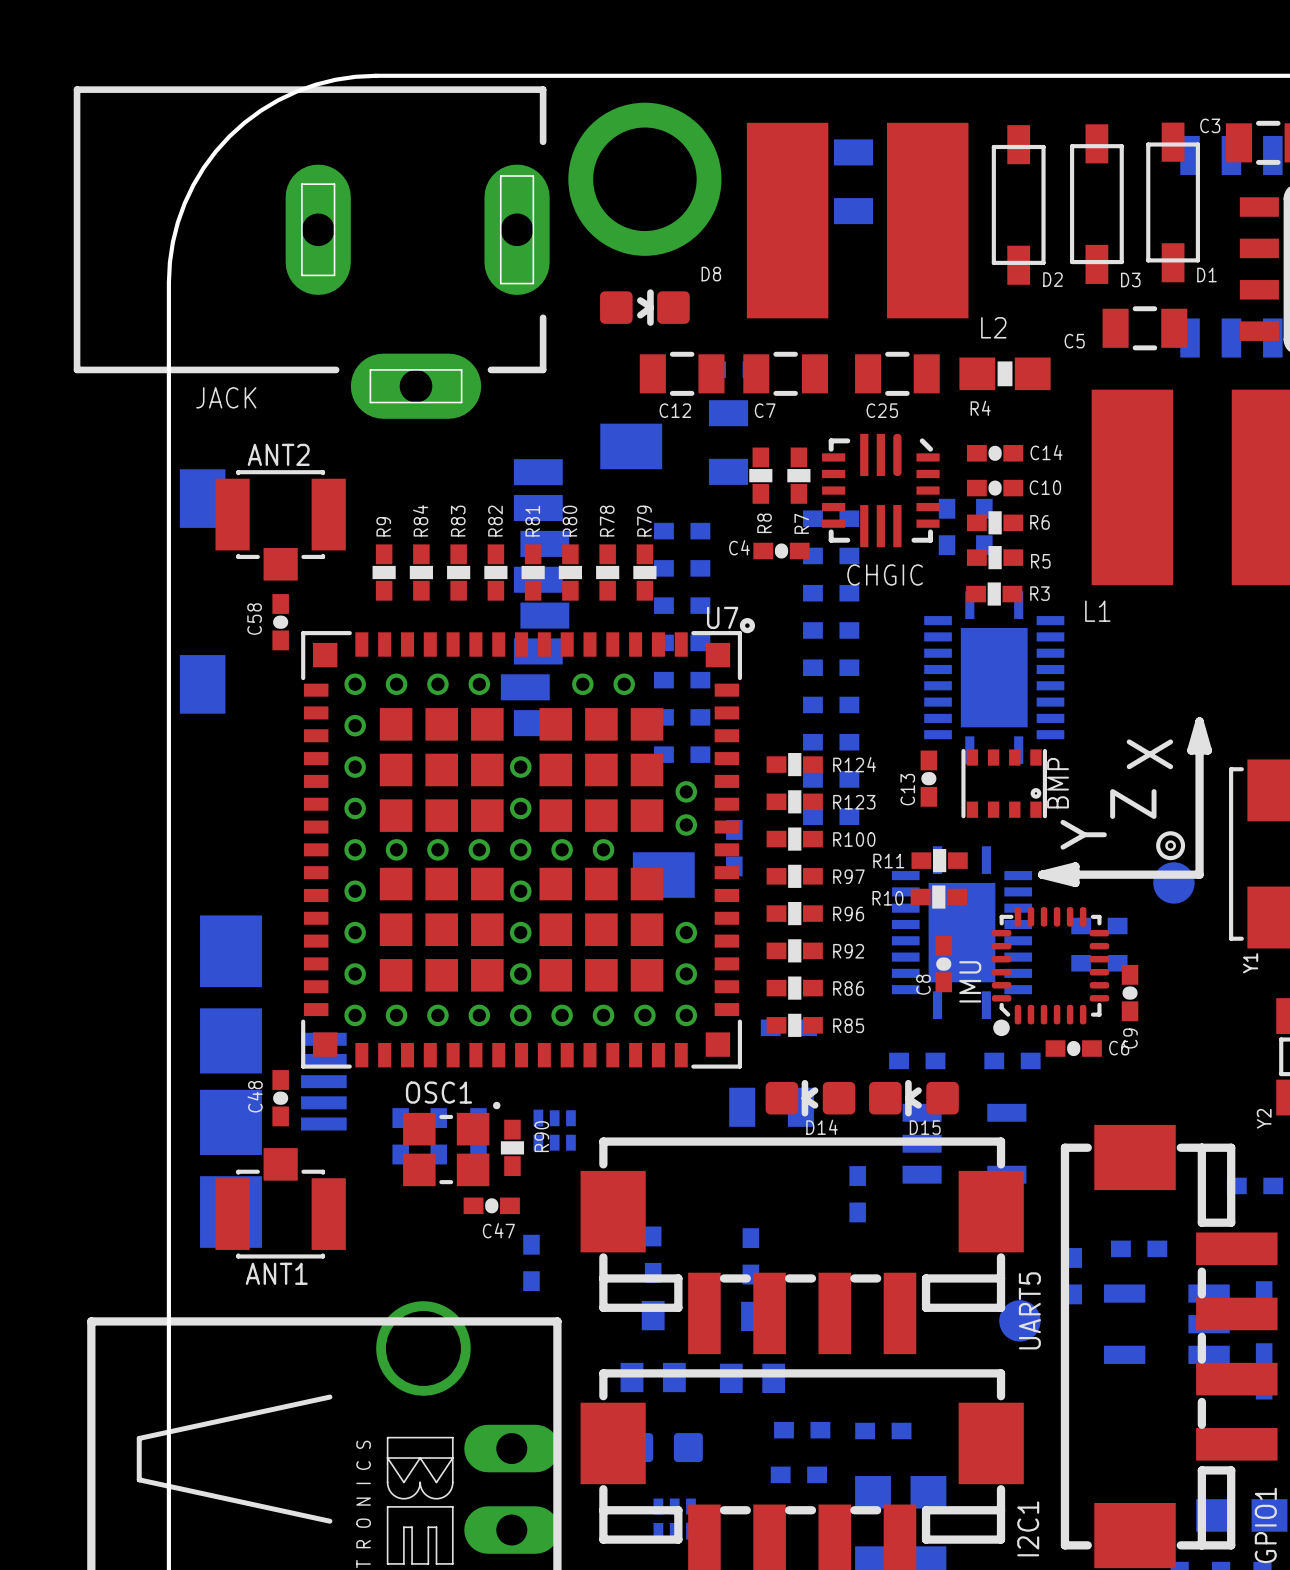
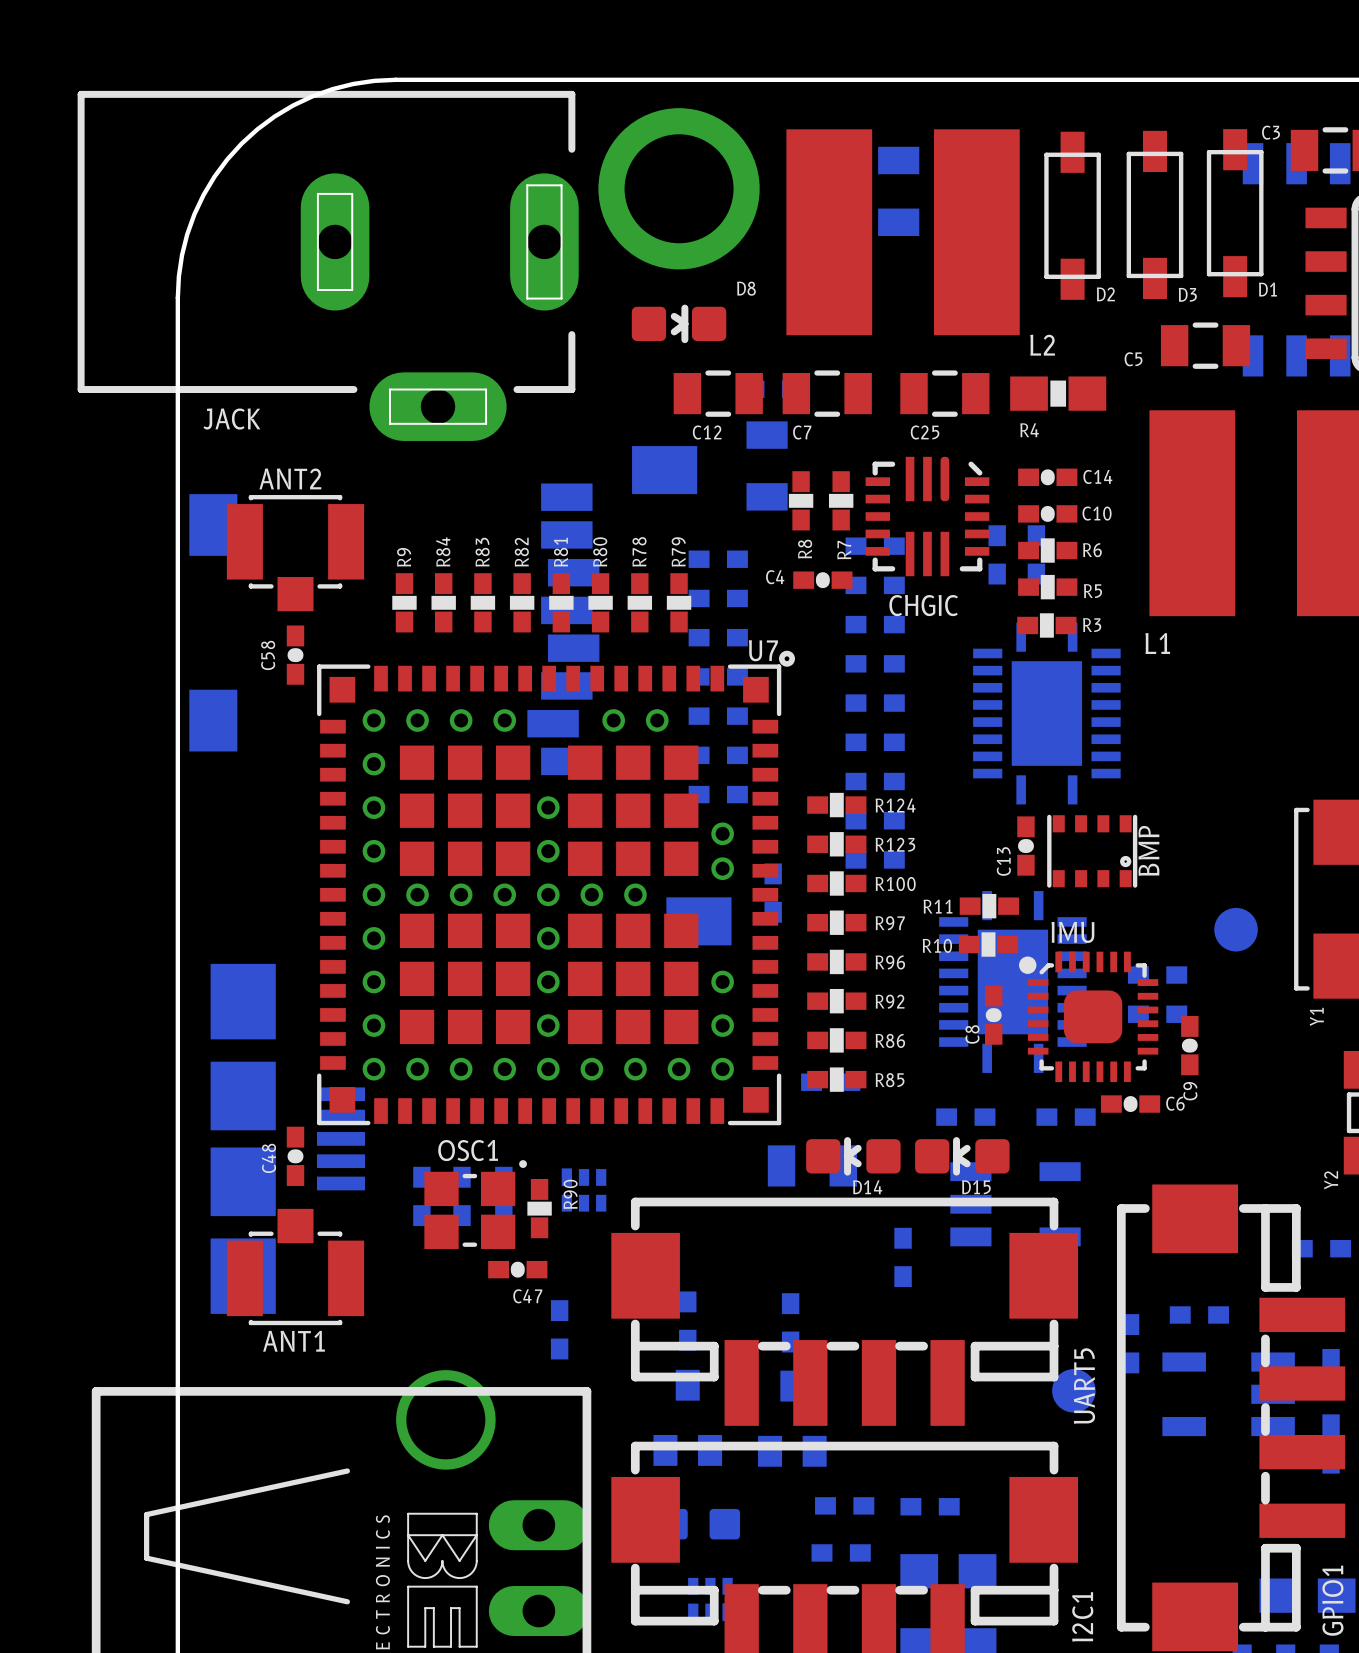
drawing: [1038, 717, 1212, 888] -> none
C13 position: (928, 778) -> (1025, 846)
BMP position: (1004, 783) -> (1092, 851)
IMU footprint: [991, 907, 1110, 1037] -> [1019, 951, 1159, 1083]
IMU name position: IMU (970, 981) -> IMU (1072, 932)

